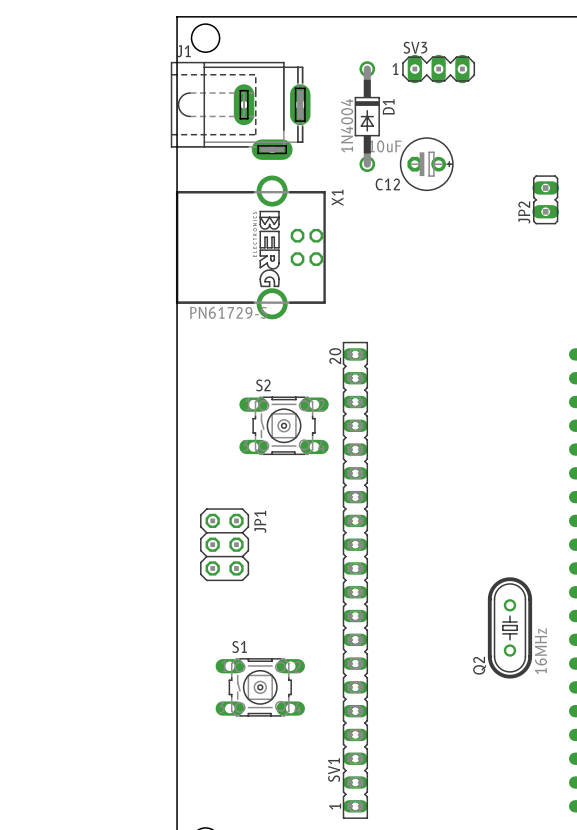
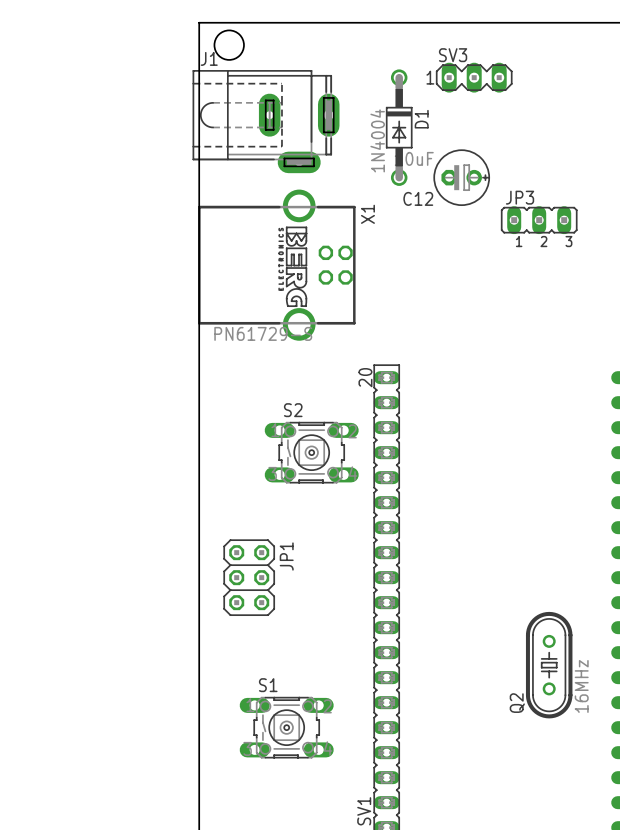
JP2: (545, 199) -> none
JP3: none -> (539, 220)

